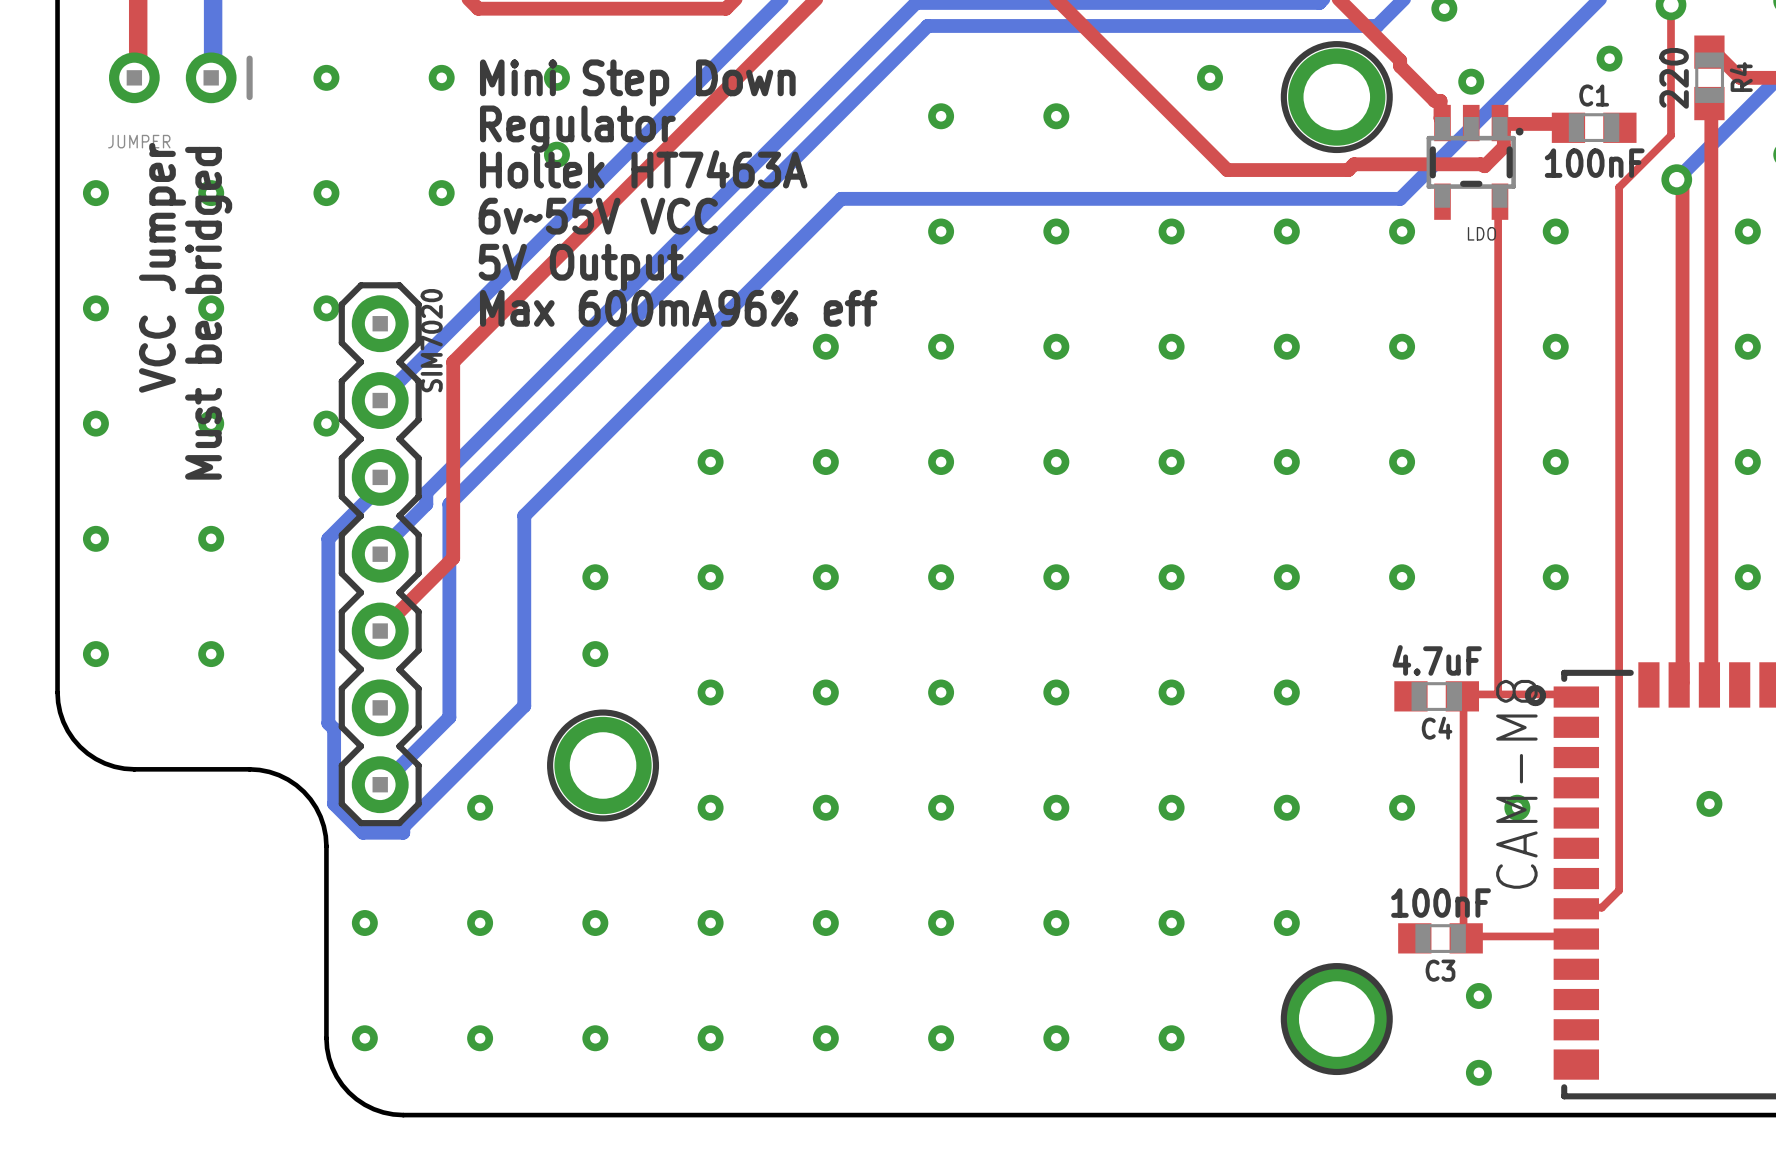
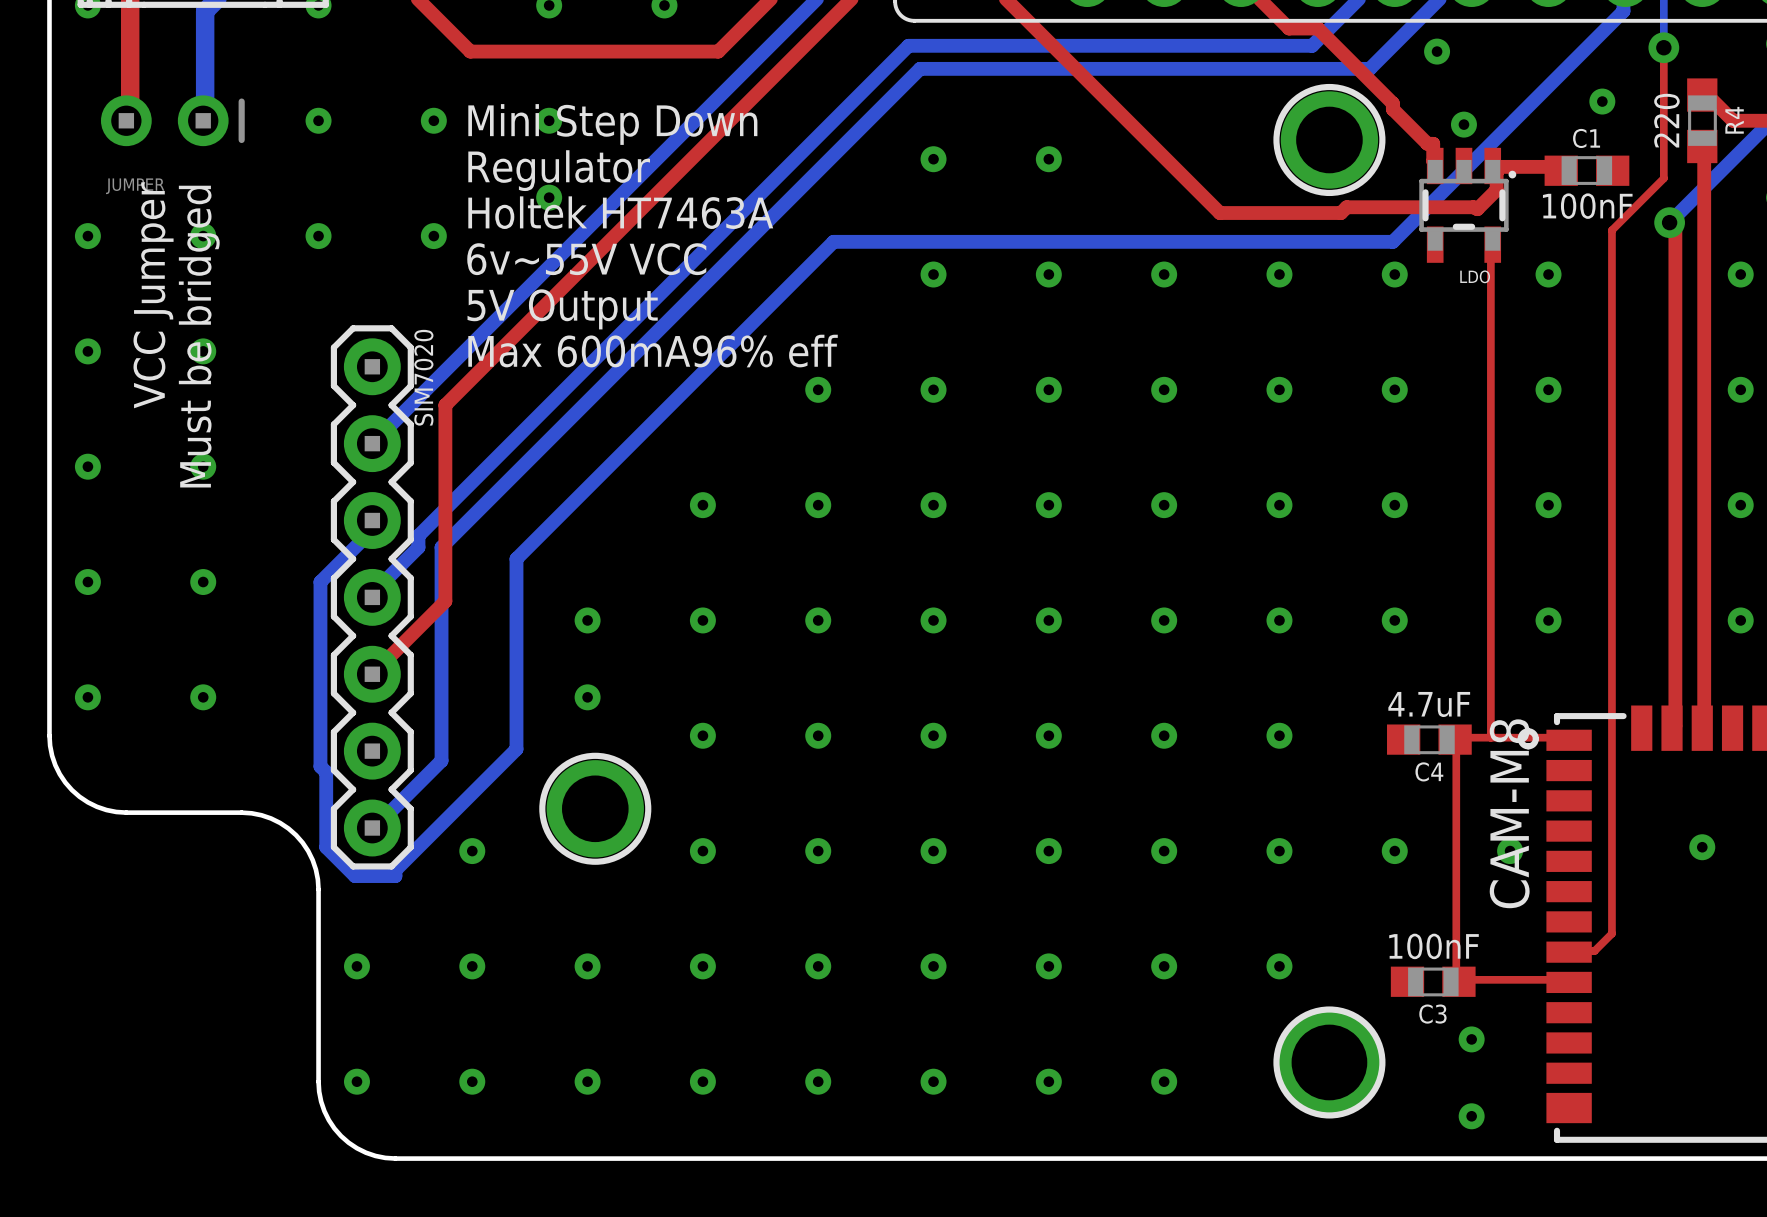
via: (1210, 77) -> none
via: (326, 308) -> none
via: (326, 423) -> none

